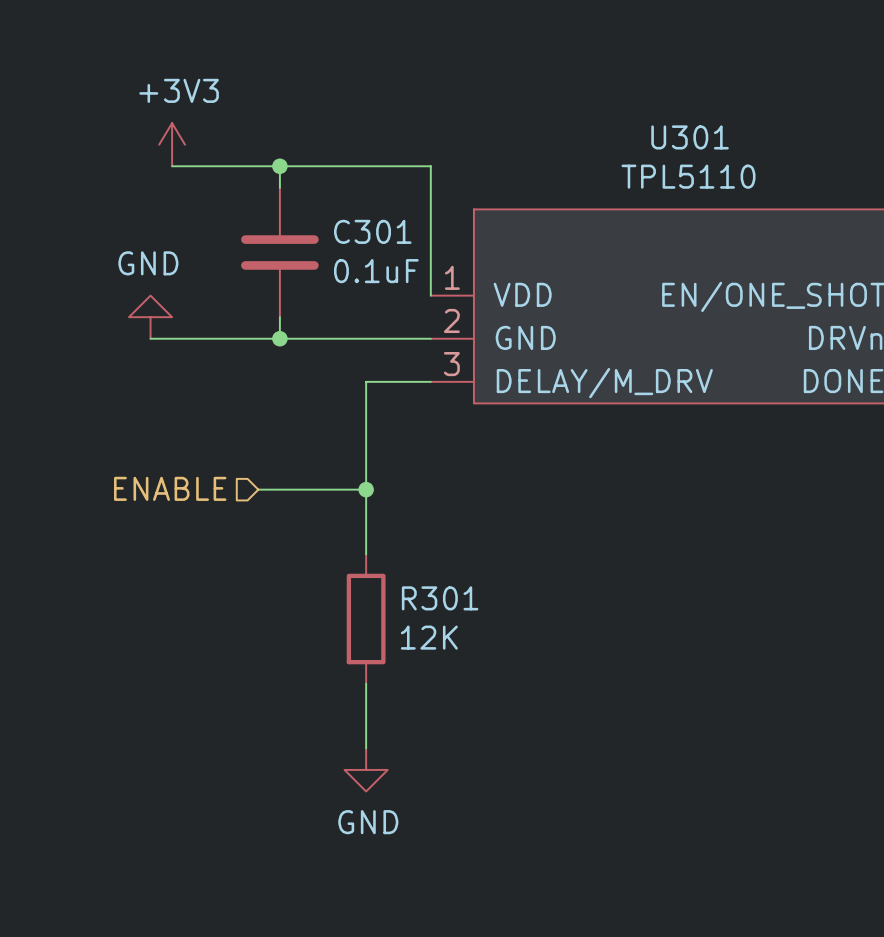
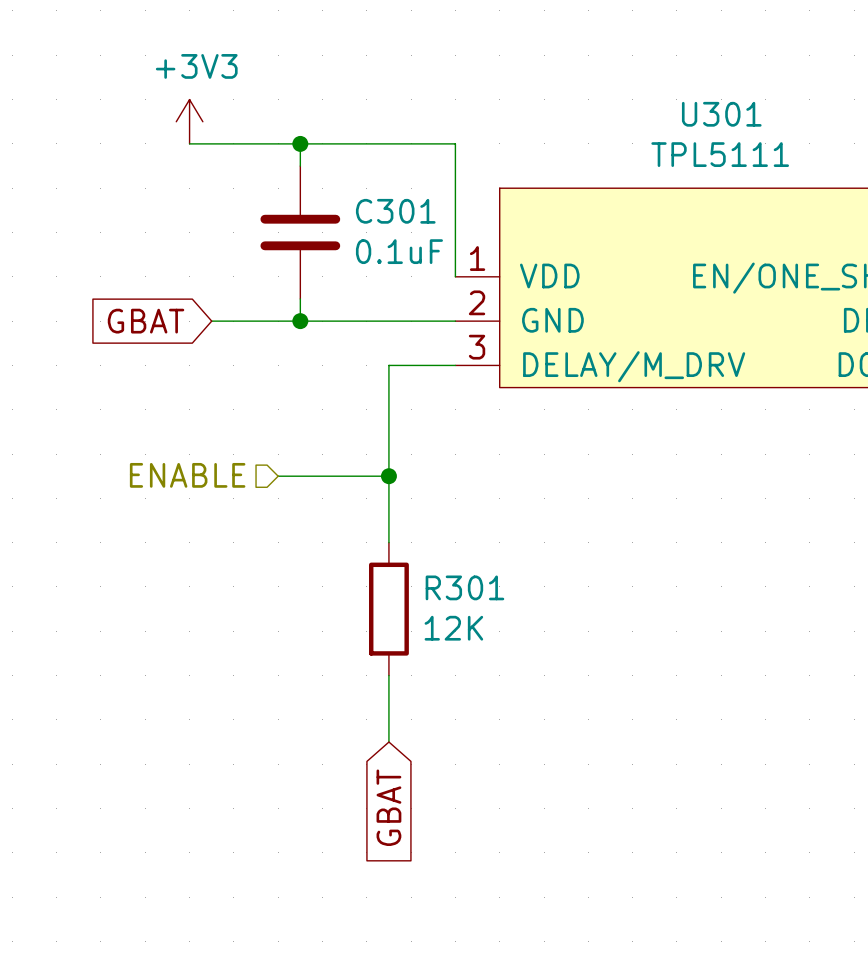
U301 value: TPL5110 (688, 176) -> TPL5111 (720, 154)
power symbol: GND (150, 317) -> none
global label: none -> GBAT (146, 321)
wire: (150, 338) (193, 338) -> none
power symbol: GND (366, 769) -> none
global label: none -> GBAT (388, 807)

